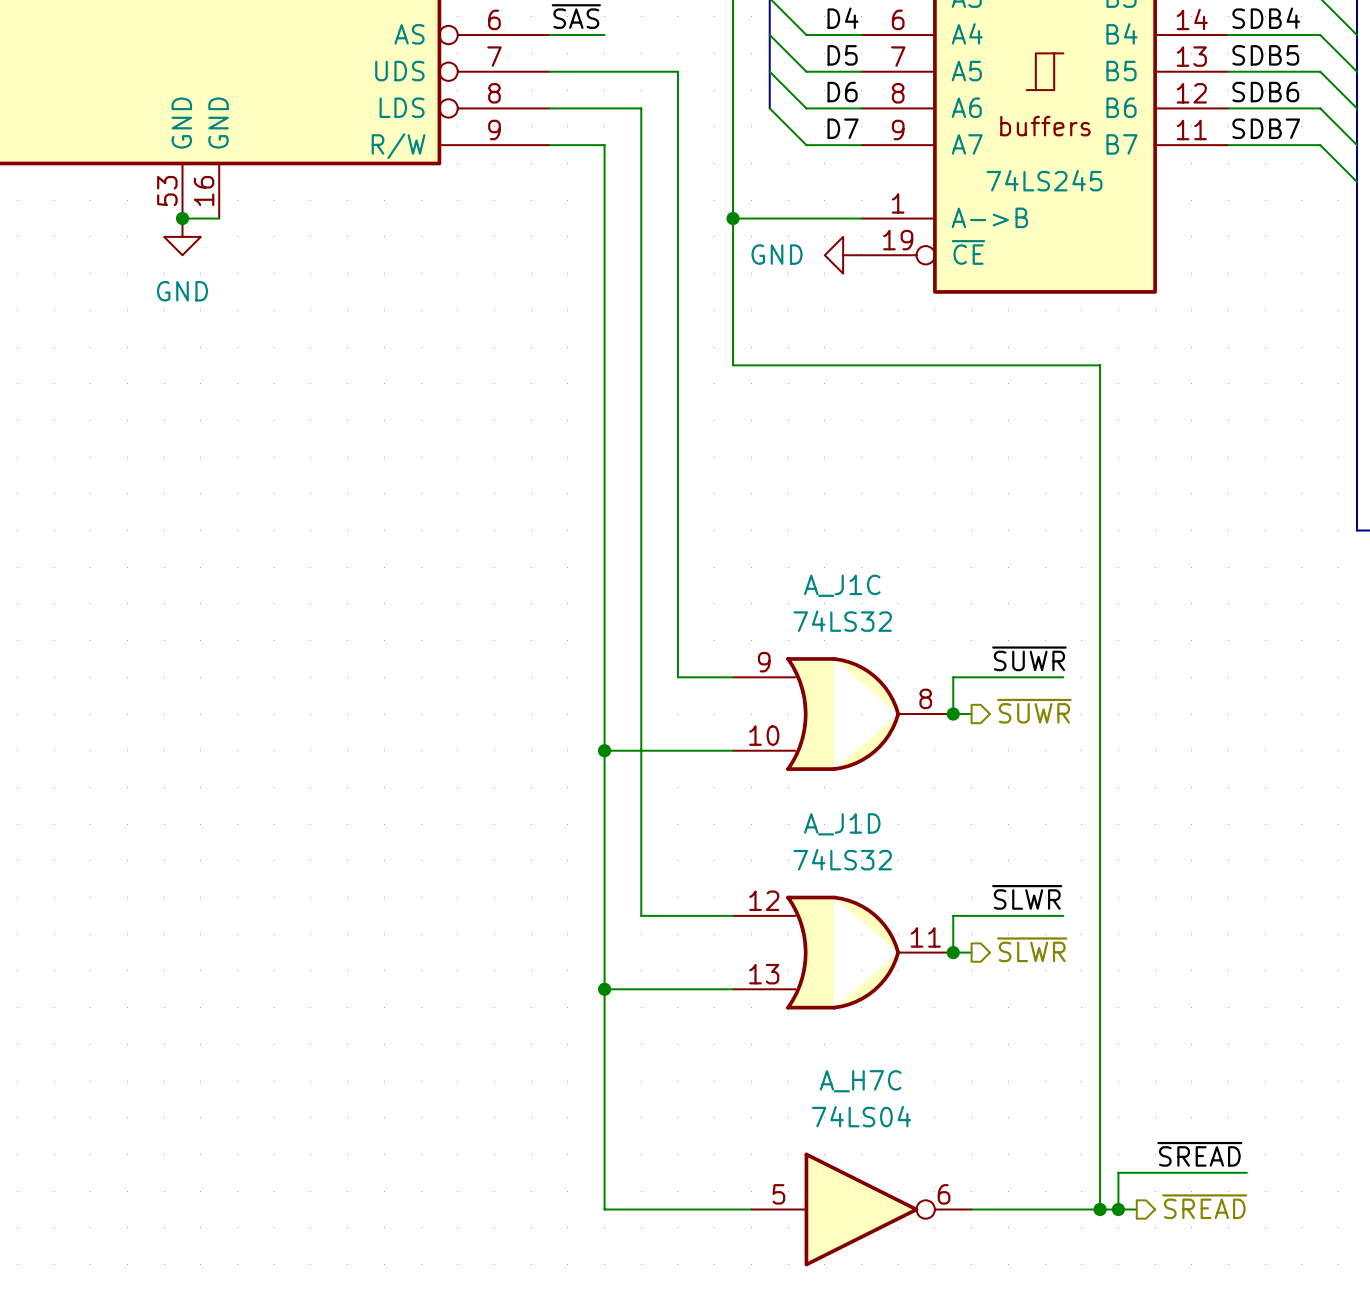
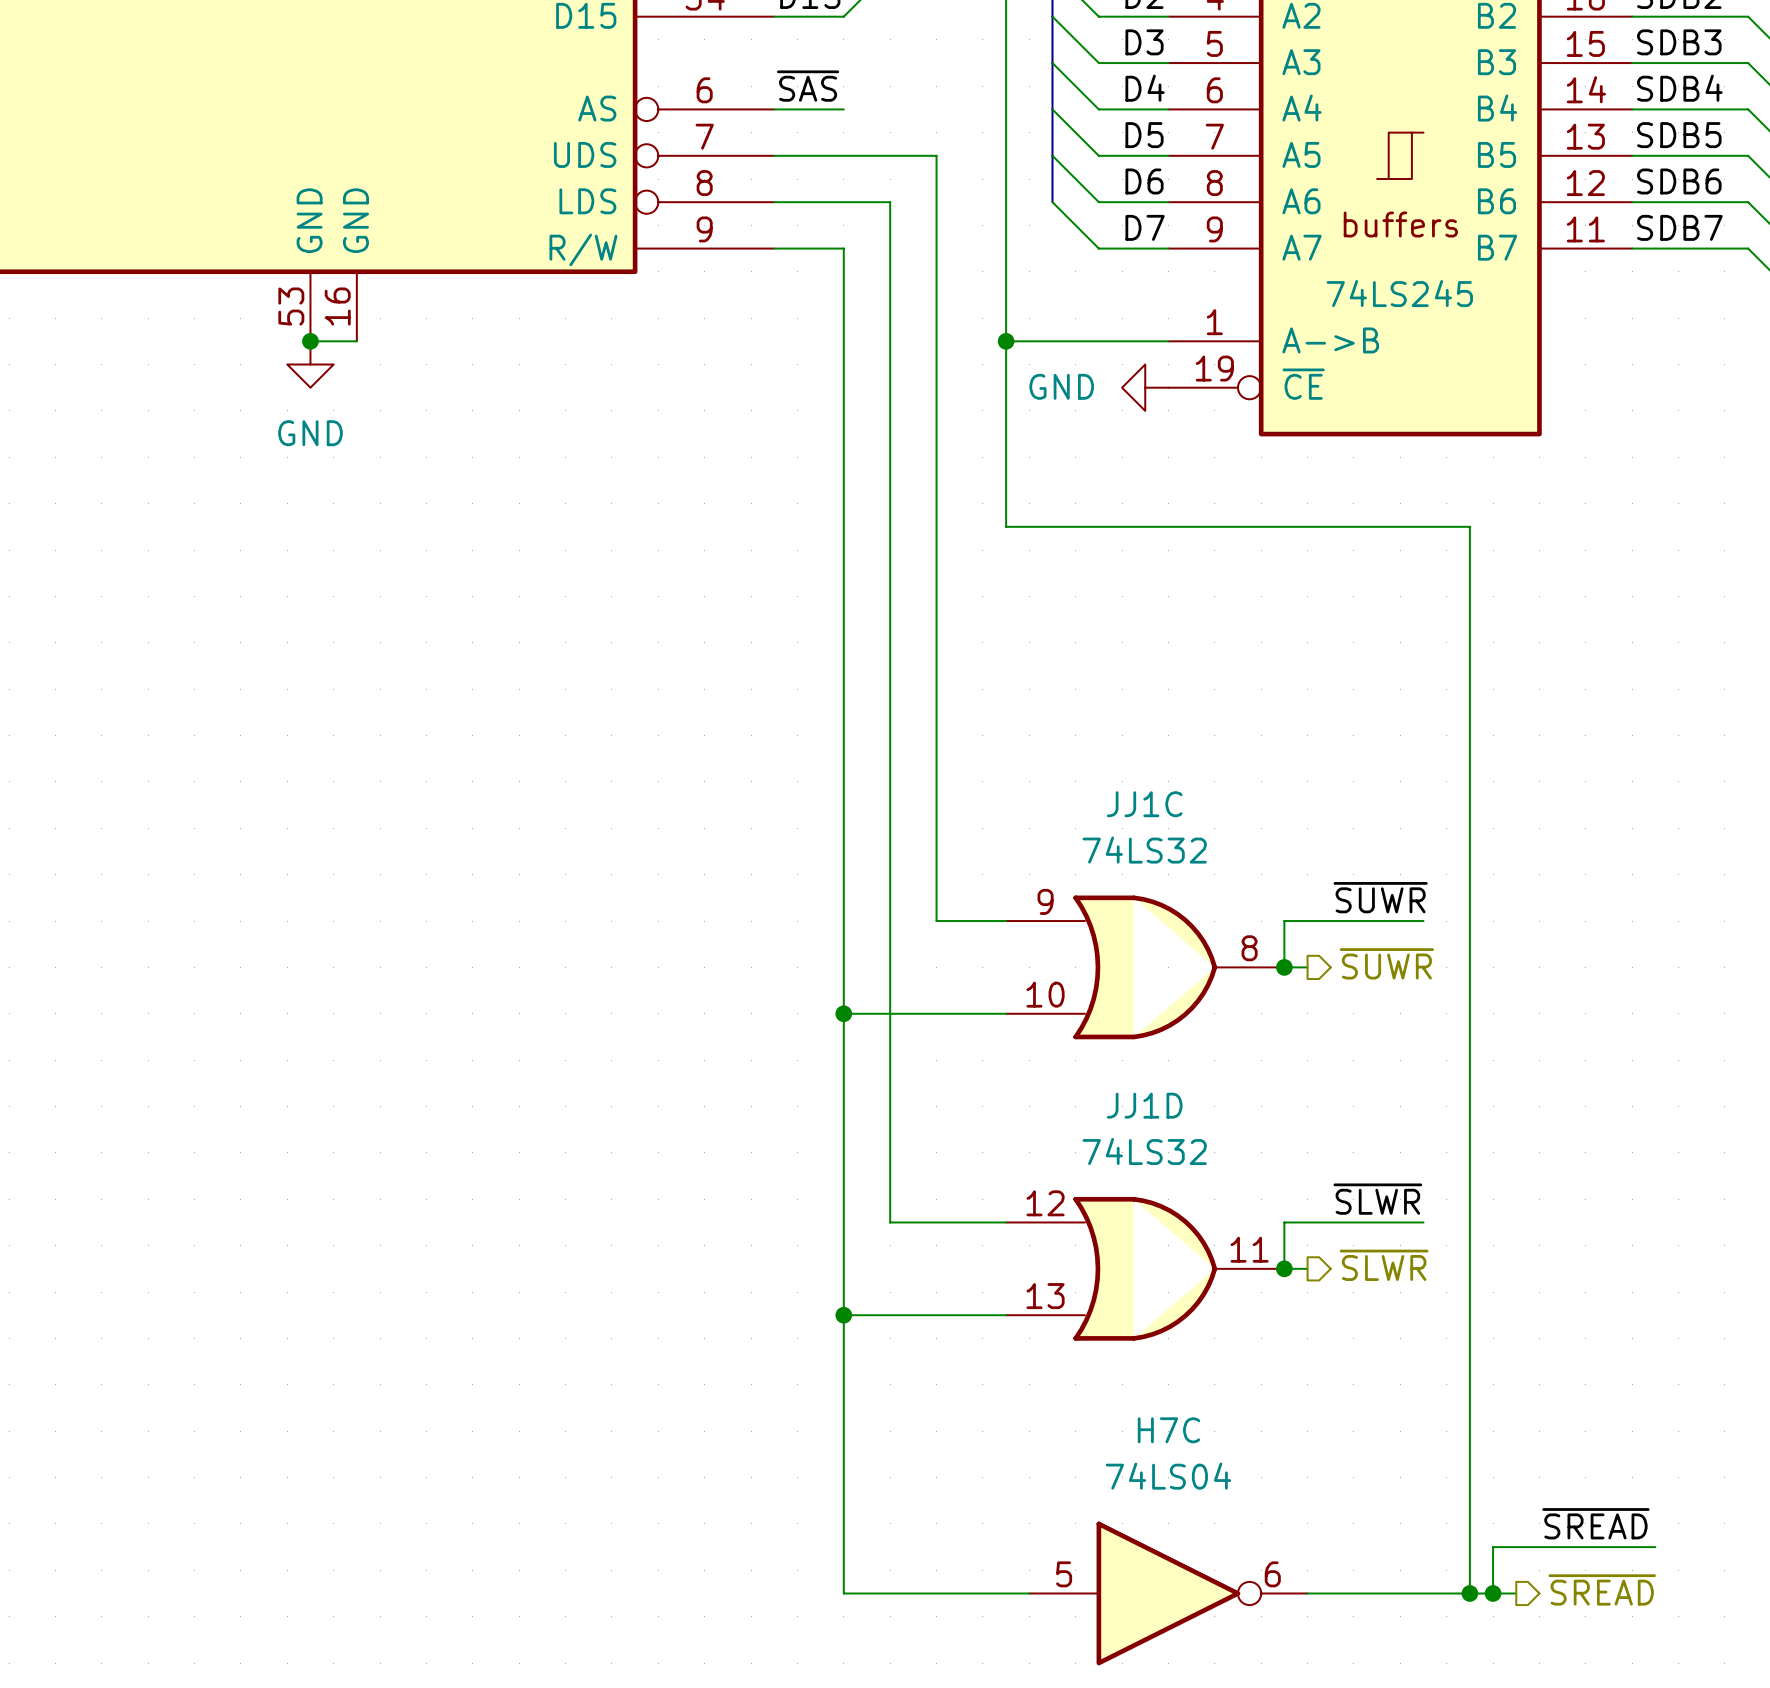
A_J1C name: A_J1C (842, 585) -> JJ1C (1144, 804)
A_J1D name: A_J1D (842, 824) -> JJ1D (1144, 1105)
A_H7C name: A_H7C (860, 1081) -> H7C (1168, 1430)

